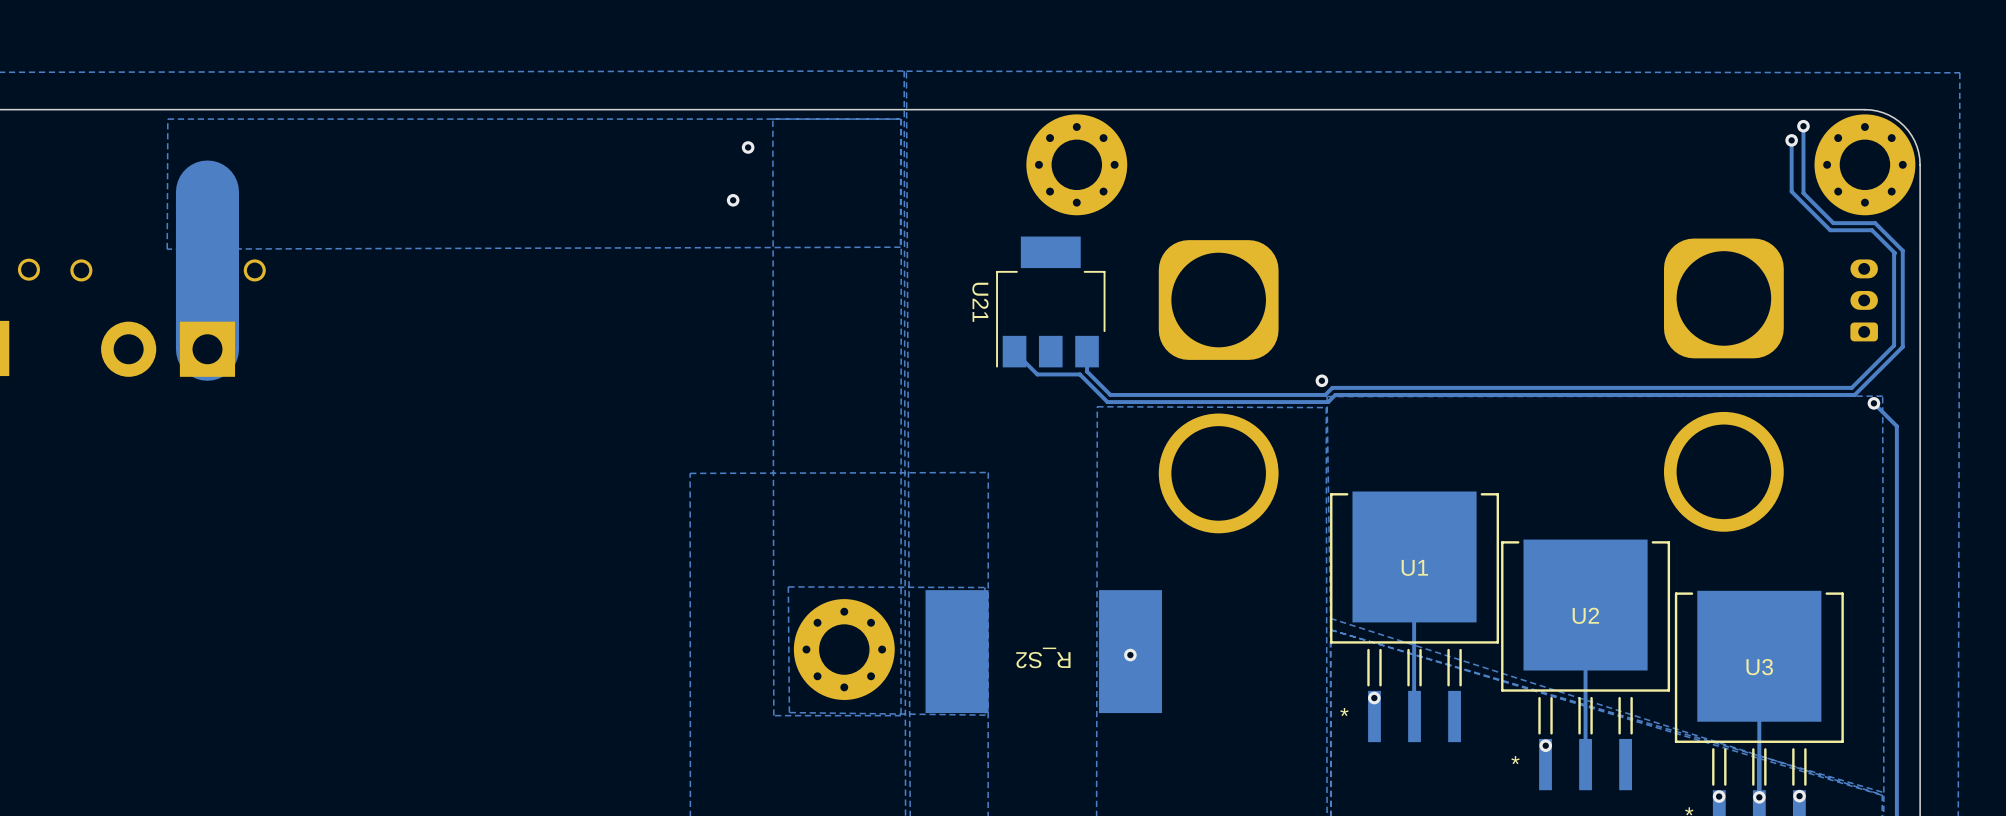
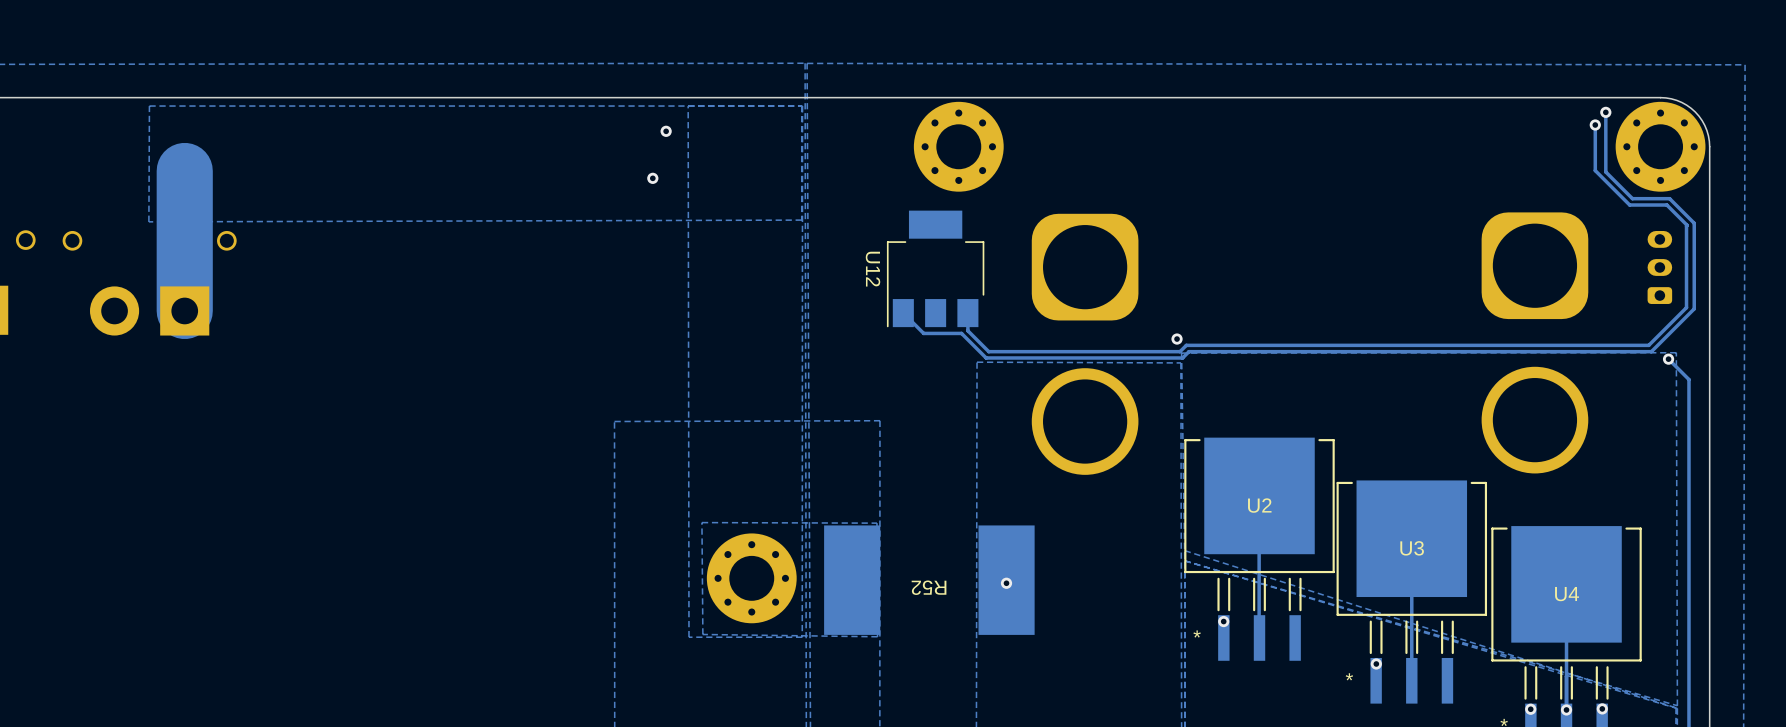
U21 name: U21 (980, 302) -> U12 (872, 269)
U1 name: U1 (1414, 567) -> U2 (1259, 505)
U2 name: U2 (1585, 615) -> U3 (1412, 548)
R_S2 name: R_S2 (1043, 657) -> R52 (929, 587)
U3 name: U3 (1759, 667) -> U4 (1567, 594)

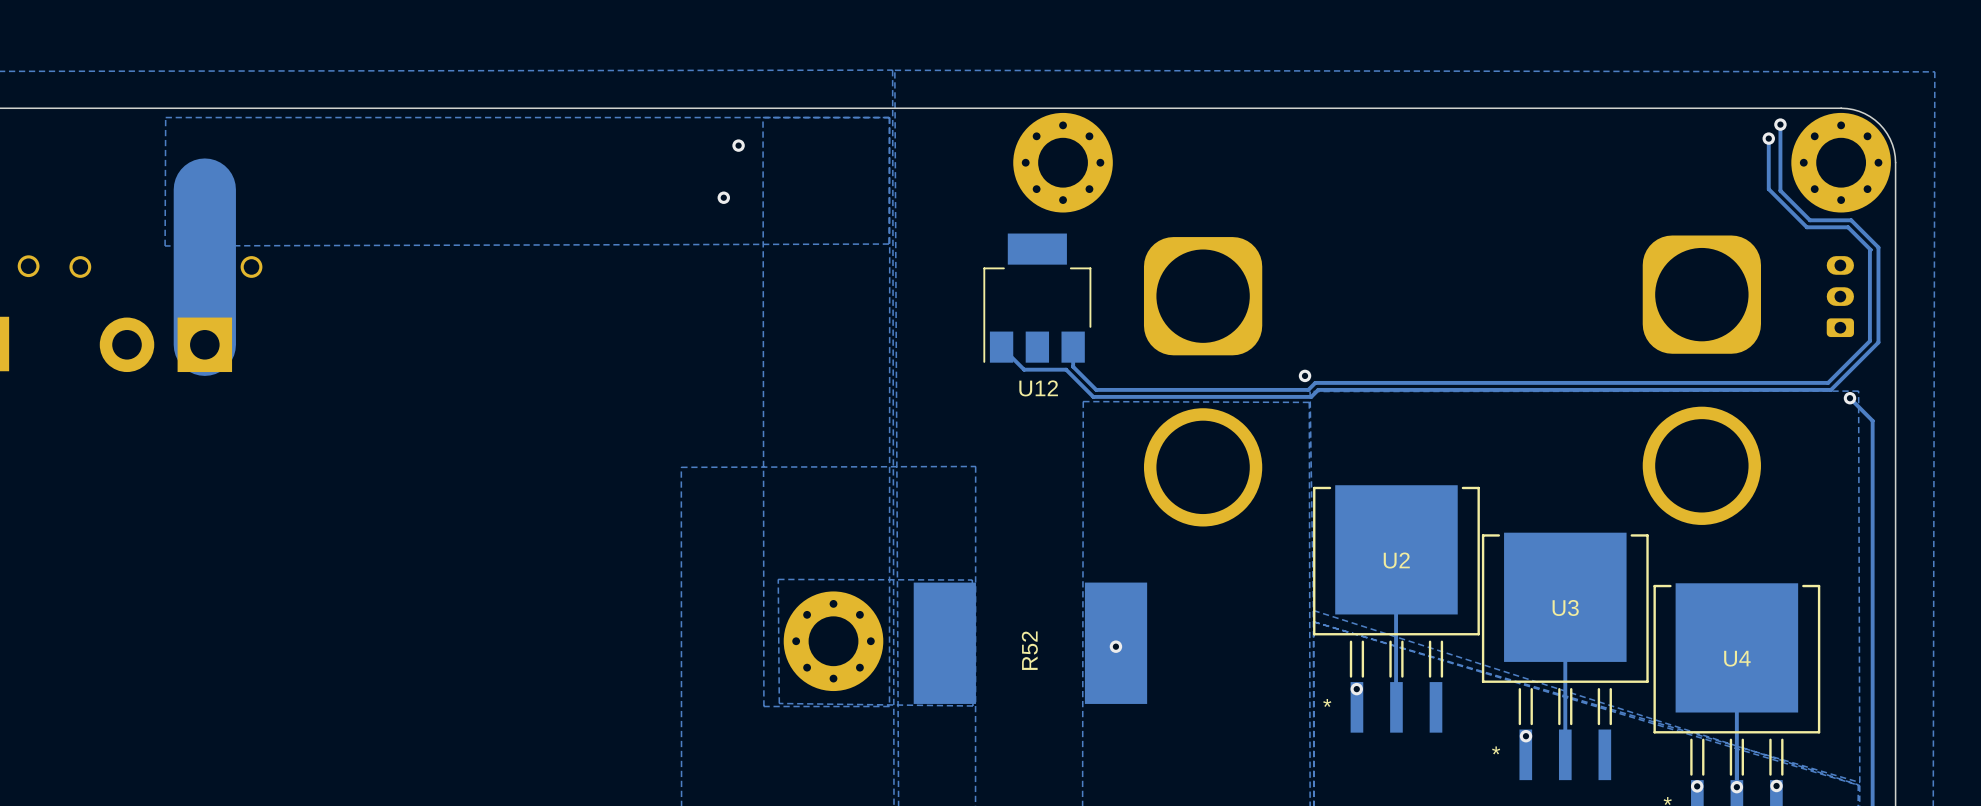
U12 name rotation: 0° (872, 269) -> 90° counterclockwise (1038, 388)
U12 name position: U12 (872, 269) -> U12 (1038, 388)
R52 name rotation: 0° (929, 587) -> 90° clockwise (1029, 650)

